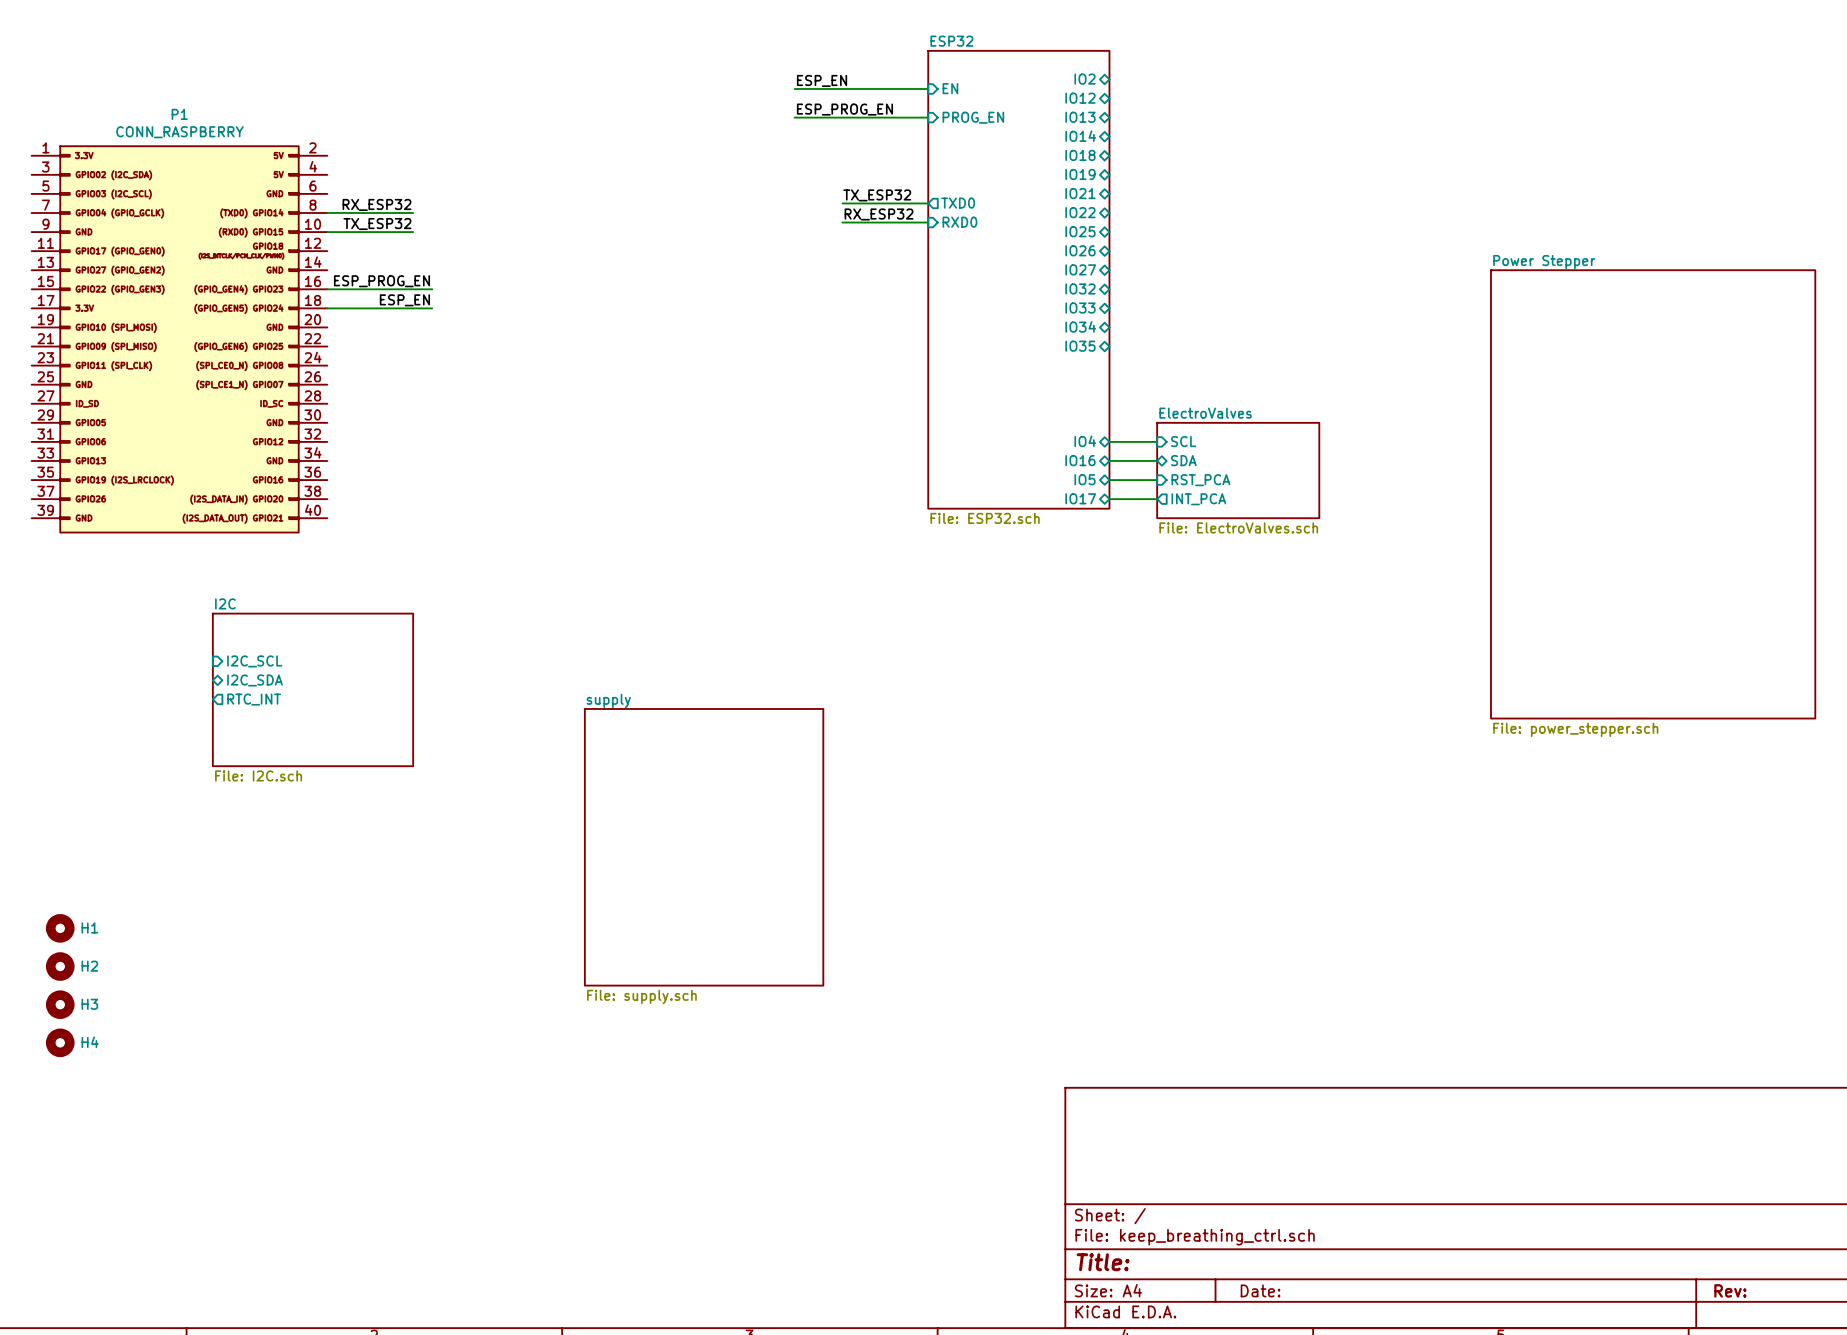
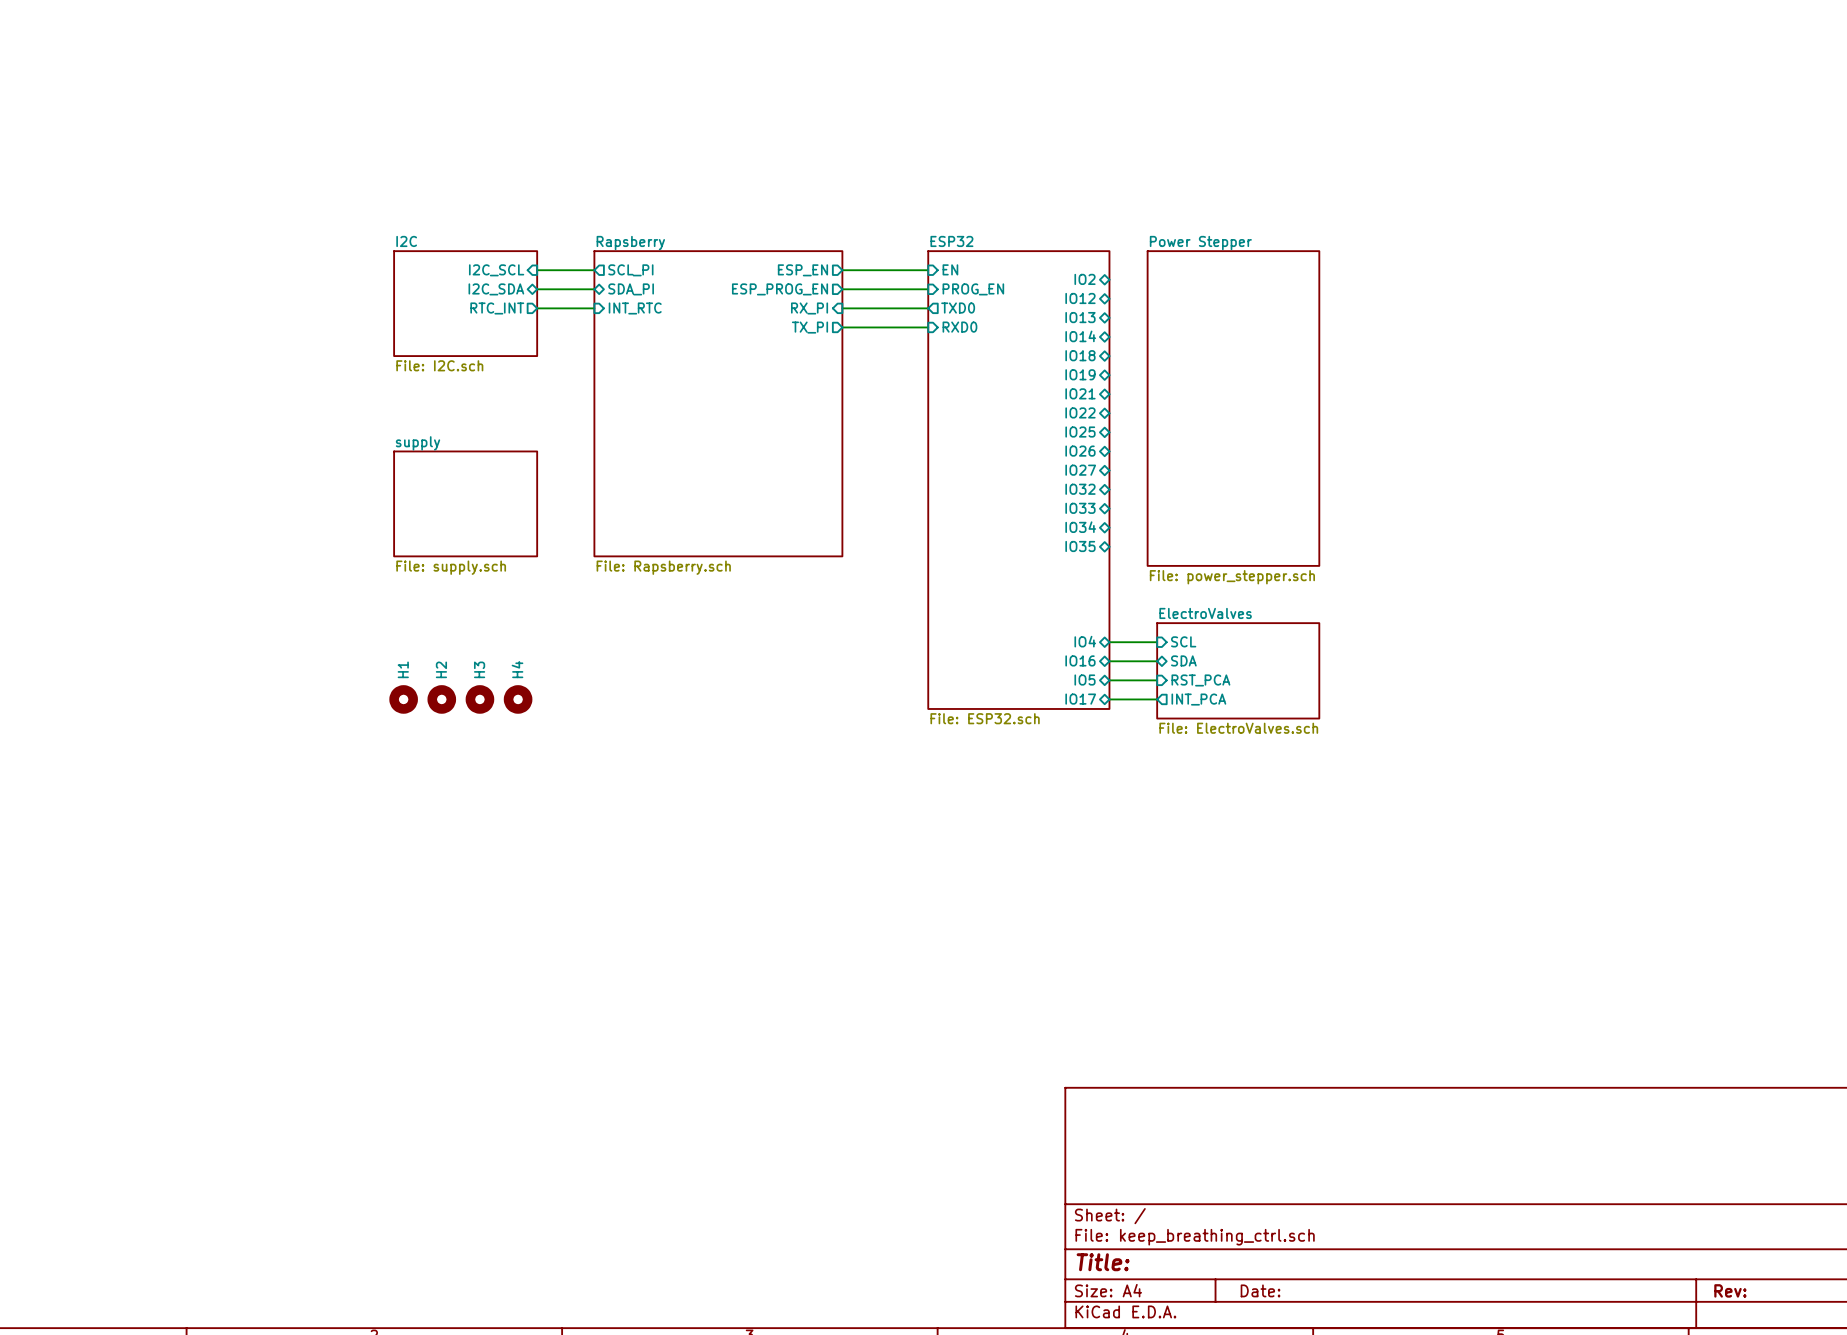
sheet pin: IO2 (1085, 79) -> none
label: ESP_EN (822, 80) -> none
wire: (794, 88) (928, 88) -> none
sheet pin position: EN (950, 88) -> EN (950, 269)
sheet pin: IO12 (1080, 98) -> none
label: ESP_PROG_EN (844, 109) -> none
wire: (794, 117) (928, 117) -> none
sheet pin position: PROG_EN (973, 117) -> PROG_EN (973, 289)
sheet pin: IO13 (1080, 117) -> none
sheet pin: IO14 (1080, 136) -> none
sheet pin: IO18 (1080, 155) -> none
sheet pin: IO19 (1080, 174) -> none
sheet pin: IO21 (1080, 193) -> none
label: TX_ESP32 (877, 195) -> none
wire: (842, 203) (928, 203) -> (842, 270) (928, 270)
sheet pin position: TXD0 (958, 203) -> TXD0 (958, 308)
label: RX_ESP32 (376, 204) -> none
wire: (327, 212) (413, 212) -> none
sheet pin: IO22 (1080, 212) -> none
label: RX_ESP32 (879, 214) -> none
wire: (842, 222) (928, 222) -> (842, 289) (928, 289)
sheet pin position: RXD0 (959, 222) -> RXD0 (959, 327)
label: TX_ESP32 (377, 224) -> none
sheet pin: IO25 (1080, 231) -> none
wire: (327, 232) (413, 232) -> none
sheet pin: IO26 (1080, 250) -> none
sheet pin: IO27 (1080, 269) -> none
sheet pin: none -> I2C_SCL (496, 270)
wire: none -> (537, 270) (594, 270)
sheet pin: none -> SCL_PI (630, 270)
sheet pin: none -> ESP_EN (802, 270)
sheet ESP32 position: (1018, 279) -> (1018, 480)
sheet pin: none -> IO2 (1085, 279)
label: ESP_PROG_EN (381, 281) -> none
sheet pin: IO32 (1080, 288) -> none
wire: (327, 289) (432, 289) -> none
sheet pin: none -> I2C_SDA (496, 289)
wire: none -> (537, 289) (594, 289)
sheet pin: none -> SDA_PI (631, 289)
sheet pin: none -> ESP_PROG_EN (780, 289)
sheet pin: none -> IO12 (1080, 298)
label: ESP_EN (404, 300) -> none
wire: (327, 308) (432, 308) -> none
sheet pin: none -> RTC_INT (497, 308)
wire: none -> (537, 308) (594, 308)
sheet pin: none -> INT_RTC (635, 308)
sheet pin: none -> RX_PI (809, 308)
wire: none -> (842, 308) (928, 308)
sheet pin: IO33 (1080, 308) -> none
sheet pin: none -> IO13 (1080, 317)
sheet pin: IO34 (1080, 326) -> none
sheet pin: none -> TX_PI (809, 327)
wire: none -> (842, 327) (928, 327)
sheet pin: none -> IO14 (1080, 336)
P1: CONN_RASPBERRY (179, 339) -> none
sheet pin: IO35 (1080, 346) -> none
sheet pin: none -> IO18 (1080, 355)
sheet pin: none -> IO19 (1080, 374)
sheet pin: none -> IO21 (1080, 393)
sheet Rapsberry: none -> File: Rapsberry.sch (718, 403)
sheet Power Stepper: none -> File: power_stepper.sch (1233, 408)
sheet pin: none -> IO22 (1080, 412)
sheet pin: none -> IO25 (1080, 432)
sheet pin: IO4 (1085, 441) -> none
wire: (1109, 441) (1157, 441) -> none
sheet pin: SCL (1183, 441) -> none
sheet pin: IO16 (1080, 460) -> IO26 (1080, 451)
wire: (1109, 460) (1157, 460) -> (1109, 642) (1157, 642)
sheet pin: SDA (1183, 460) -> none
sheet pin: none -> IO27 (1080, 470)
sheet ElectroValves: File: ElectroValves.sch (1238, 470) -> none
sheet pin: IO5 (1085, 479) -> none
wire: (1109, 480) (1157, 480) -> (1109, 661) (1157, 661)
sheet pin: RST_PCA (1200, 480) -> none
sheet pin: none -> IO32 (1080, 489)
sheet Power Stepper: File: power_stepper.sch (1653, 494) -> none
sheet pin: IO17 (1080, 498) -> none
wire: (1109, 499) (1157, 499) -> (1109, 680) (1157, 680)
sheet pin: INT_PCA (1198, 499) -> none
sheet supply: none -> File: supply.sch (465, 503)
sheet pin: none -> IO33 (1080, 508)
sheet pin: none -> IO34 (1080, 527)
sheet pin: none -> IO35 (1080, 546)
sheet I2C name position: I2C (225, 603) -> I2C (406, 241)
sheet I2C shape: [212, 613, 414, 767] -> [394, 251, 538, 357]
sheet pin: none -> IO4 (1085, 641)
sheet pin: none -> SCL (1183, 641)
sheet pin: none -> IO16 (1080, 660)
sheet pin: none -> SDA (1183, 660)
sheet pin: I2C_SCL (254, 661) -> none
sheet ElectroValves: none -> File: ElectroValves.sch (1238, 670)
sheet pin: I2C_SDA (255, 680) -> none
sheet pin: none -> IO5 (1085, 680)
sheet pin: none -> RST_PCA (1200, 680)
sheet pin: RTC_INT (254, 699) -> none
sheet pin: none -> IO17 (1080, 699)
wire: none -> (1109, 699) (1157, 699)
sheet pin: none -> INT_PCA (1198, 699)
sheet I2C value position: File: I2C.sch (258, 775) -> File: I2C.sch (439, 365)
sheet supply: File: supply.sch (704, 847) -> none
H1 position: (60, 928) -> (403, 699)
H1 name rotation: 0° (89, 928) -> 90° counterclockwise (403, 669)
H1 name position: H1 (89, 928) -> H1 (403, 669)
H2 position: (60, 966) -> (441, 699)
H2 name rotation: 0° (89, 966) -> 90° counterclockwise (441, 669)
H2 name position: H2 (89, 966) -> H2 (441, 669)
H3 position: (60, 1004) -> (479, 699)
H3 name rotation: 0° (89, 1004) -> 90° counterclockwise (479, 669)
H3 name position: H3 (89, 1004) -> H3 (479, 669)
H4 position: (60, 1042) -> (518, 699)
H4 name rotation: 0° (90, 1042) -> 90° counterclockwise (517, 669)
H4 name position: H4 (90, 1042) -> H4 (517, 669)

